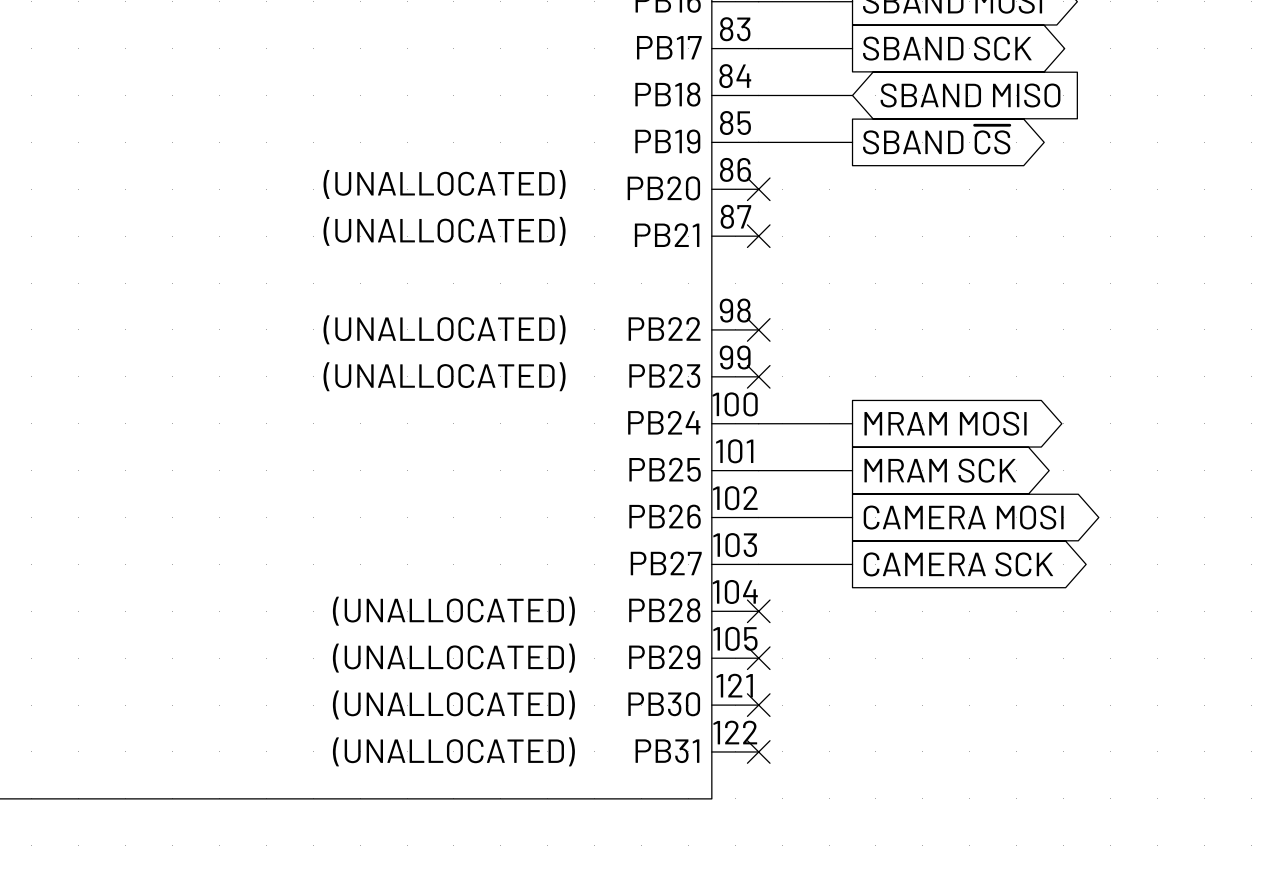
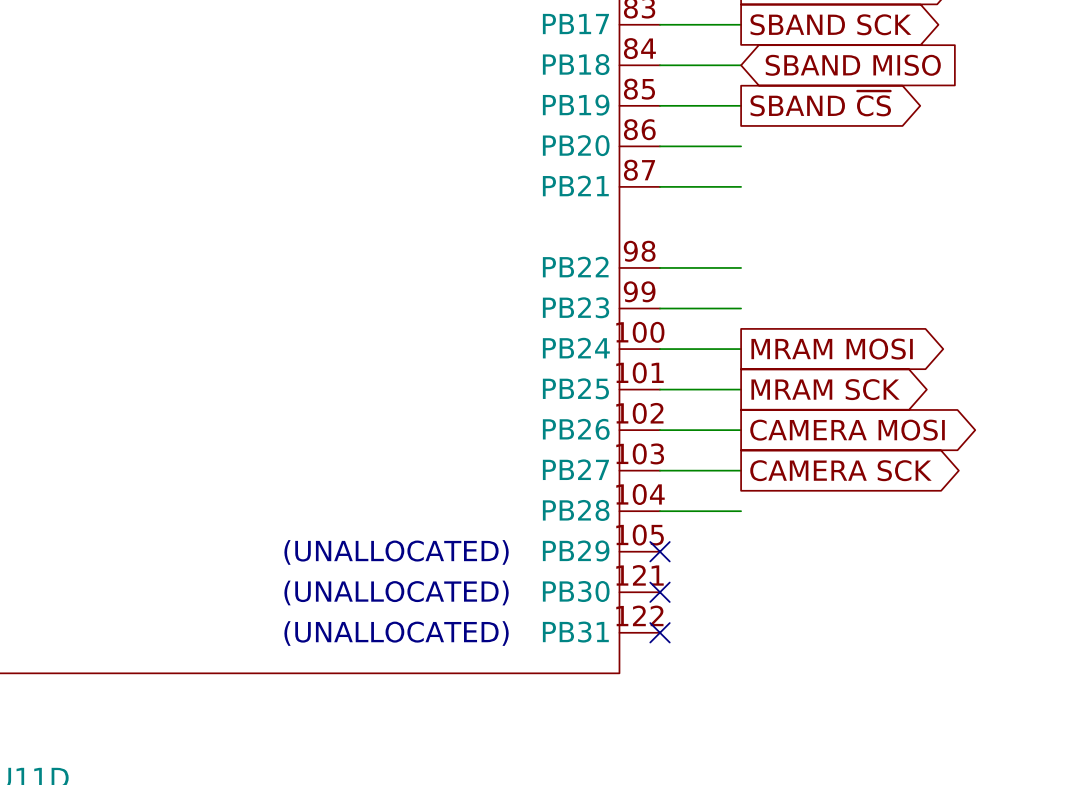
text: (UNALLOCATED) (444, 184) -> none
wire: none -> (660, 146) (741, 146)
no-connect mark: (758, 189) -> none
text: (UNALLOCATED) (444, 231) -> none
wire: none -> (660, 186) (741, 186)
no-connect mark: (758, 236) -> none
text: (UNALLOCATED) (444, 329) -> none
wire: none -> (660, 267) (741, 267)
no-connect mark: (758, 329) -> none
text: (UNALLOCATED) (444, 376) -> none
wire: none -> (660, 308) (741, 308)
no-connect mark: (758, 376) -> none
text: (UNALLOCATED) (453, 611) -> none
wire: none -> (660, 511) (741, 511)
no-connect mark: (758, 611) -> none

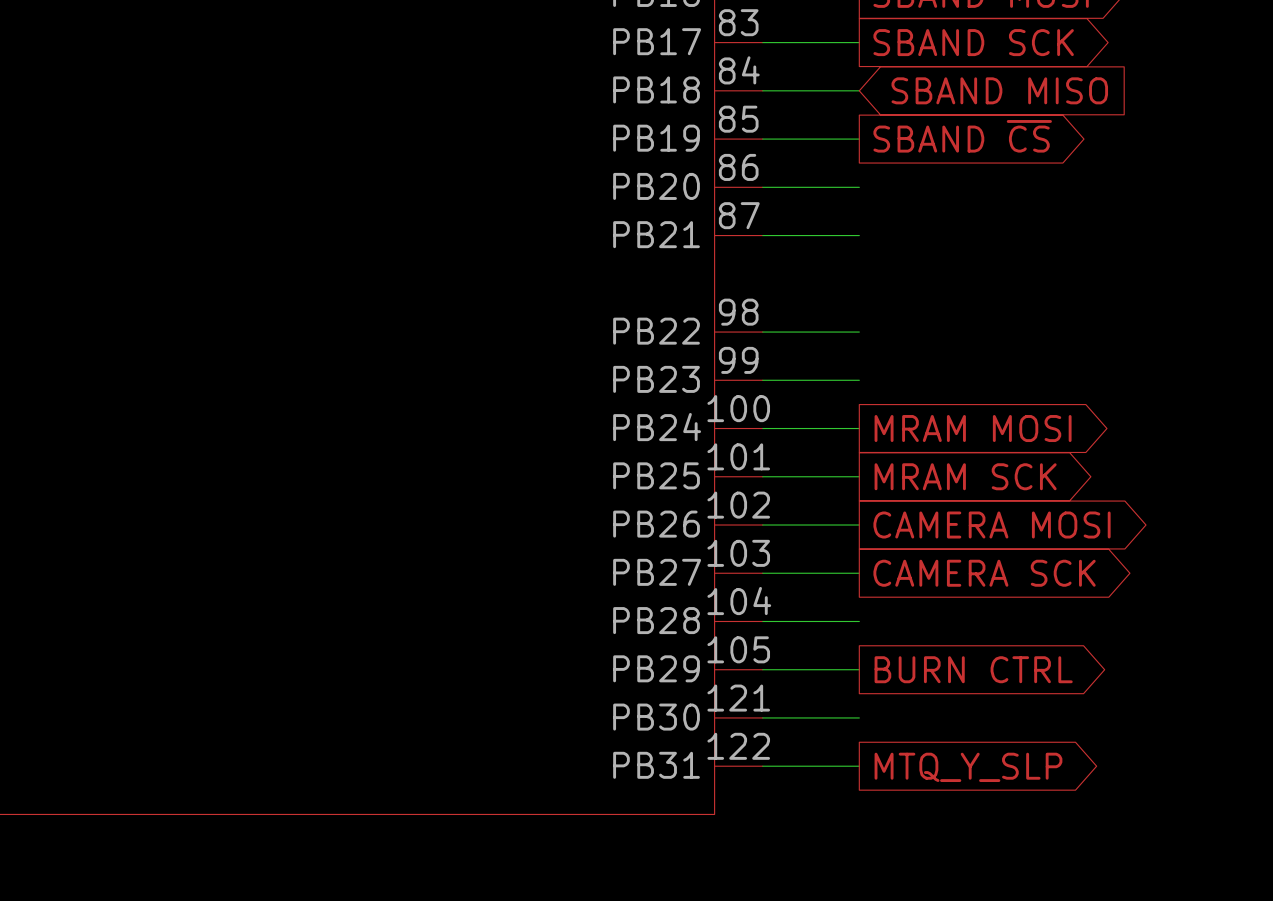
wire: none -> (762, 669) (859, 669)
no-connect mark: (660, 551) -> none
global label: none -> BURN CTRL (973, 669)
text: (UNALLOCATED) (396, 552) -> none
text: (UNALLOCATED) (396, 592) -> none
wire: none -> (762, 717) (859, 717)
no-connect mark: (660, 592) -> none
wire: none -> (762, 766) (859, 766)
no-connect mark: (660, 632) -> none
text: (UNALLOCATED) (396, 633) -> none
global label: none -> MTQ_Y_SLP (968, 767)

